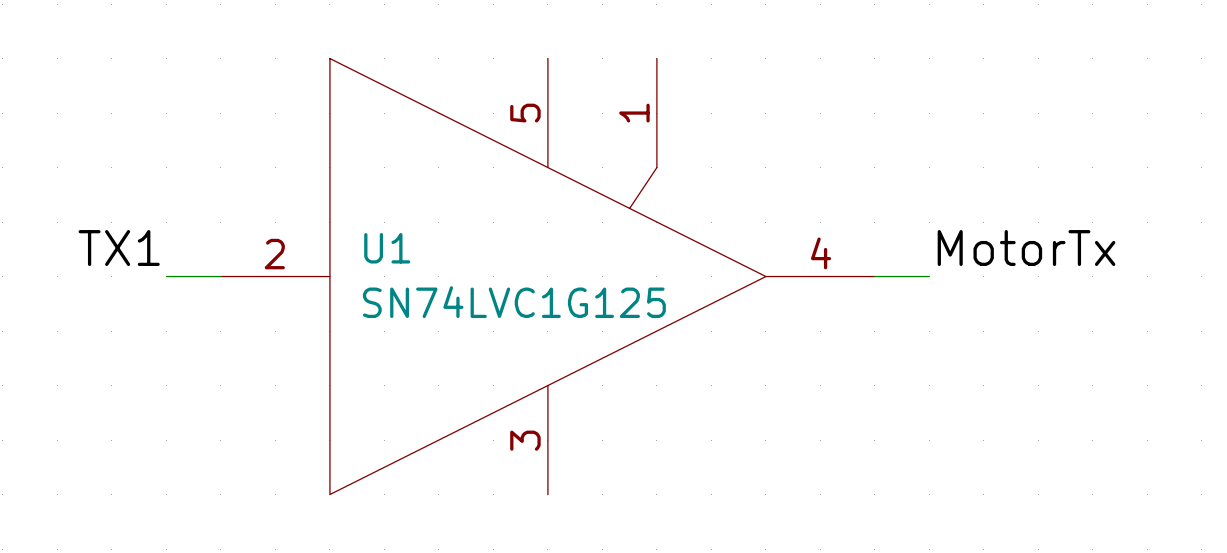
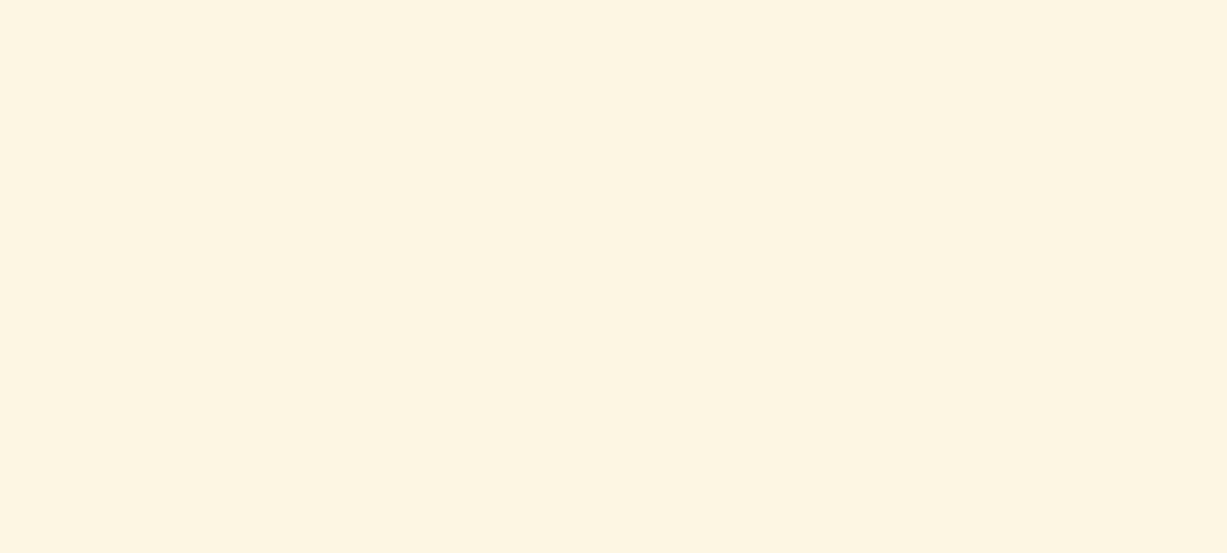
label: TX1 (119, 248) -> none
label: MotorTx (1026, 248) -> none
wire: (166, 276) (220, 276) -> none
U1: SN74LVC1G125 (547, 276) -> none
wire: (874, 276) (929, 276) -> none

